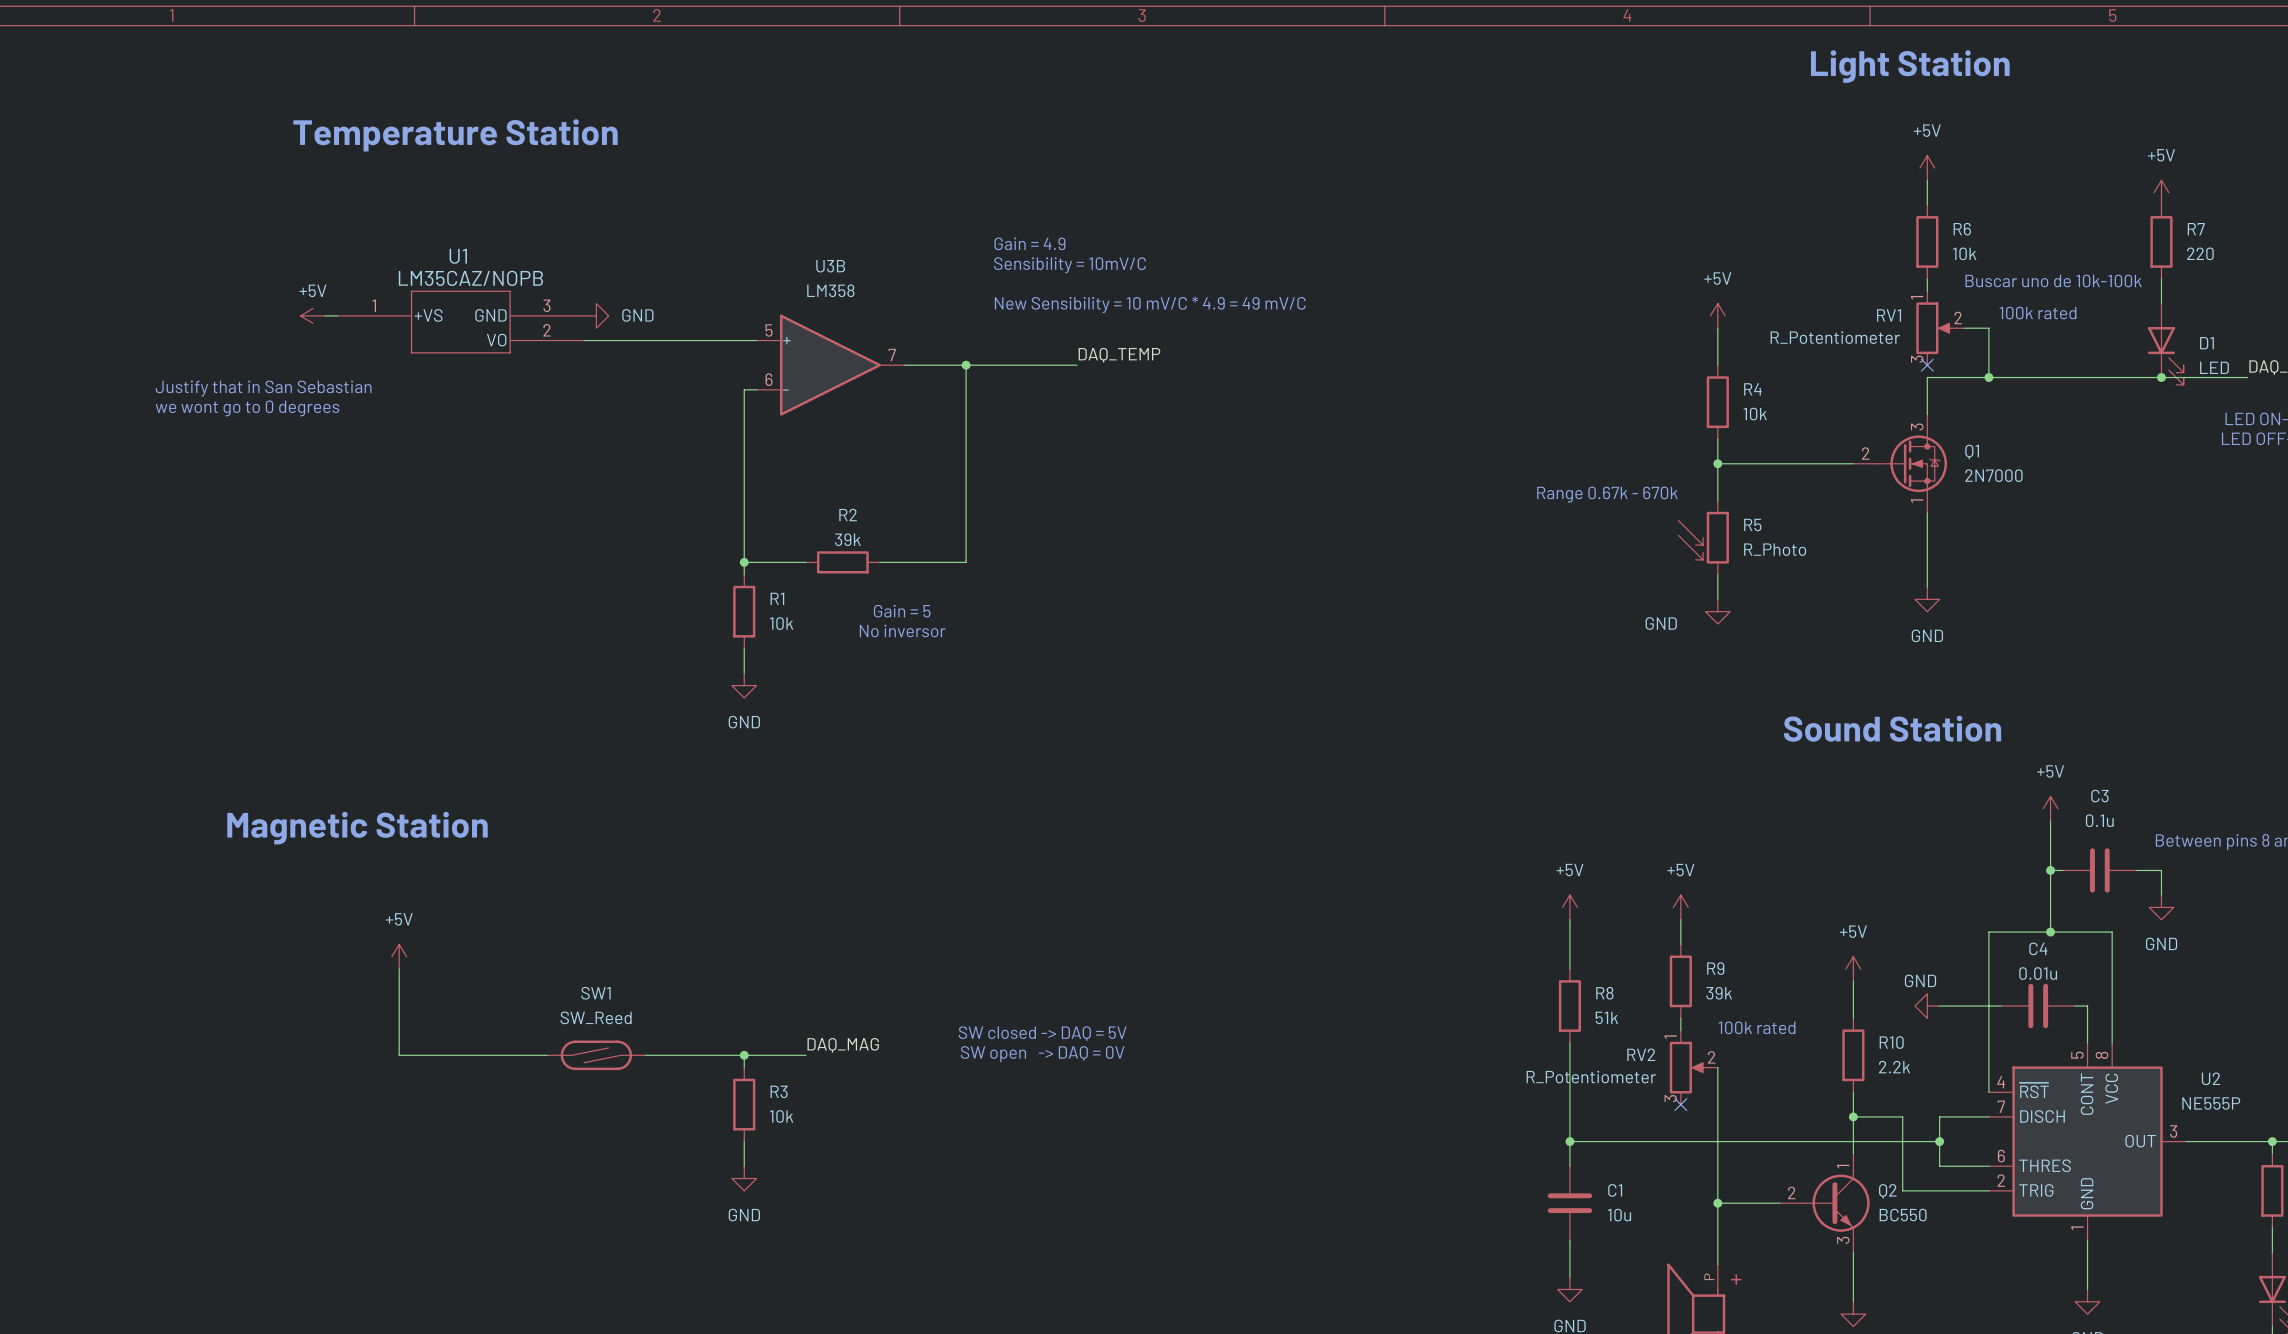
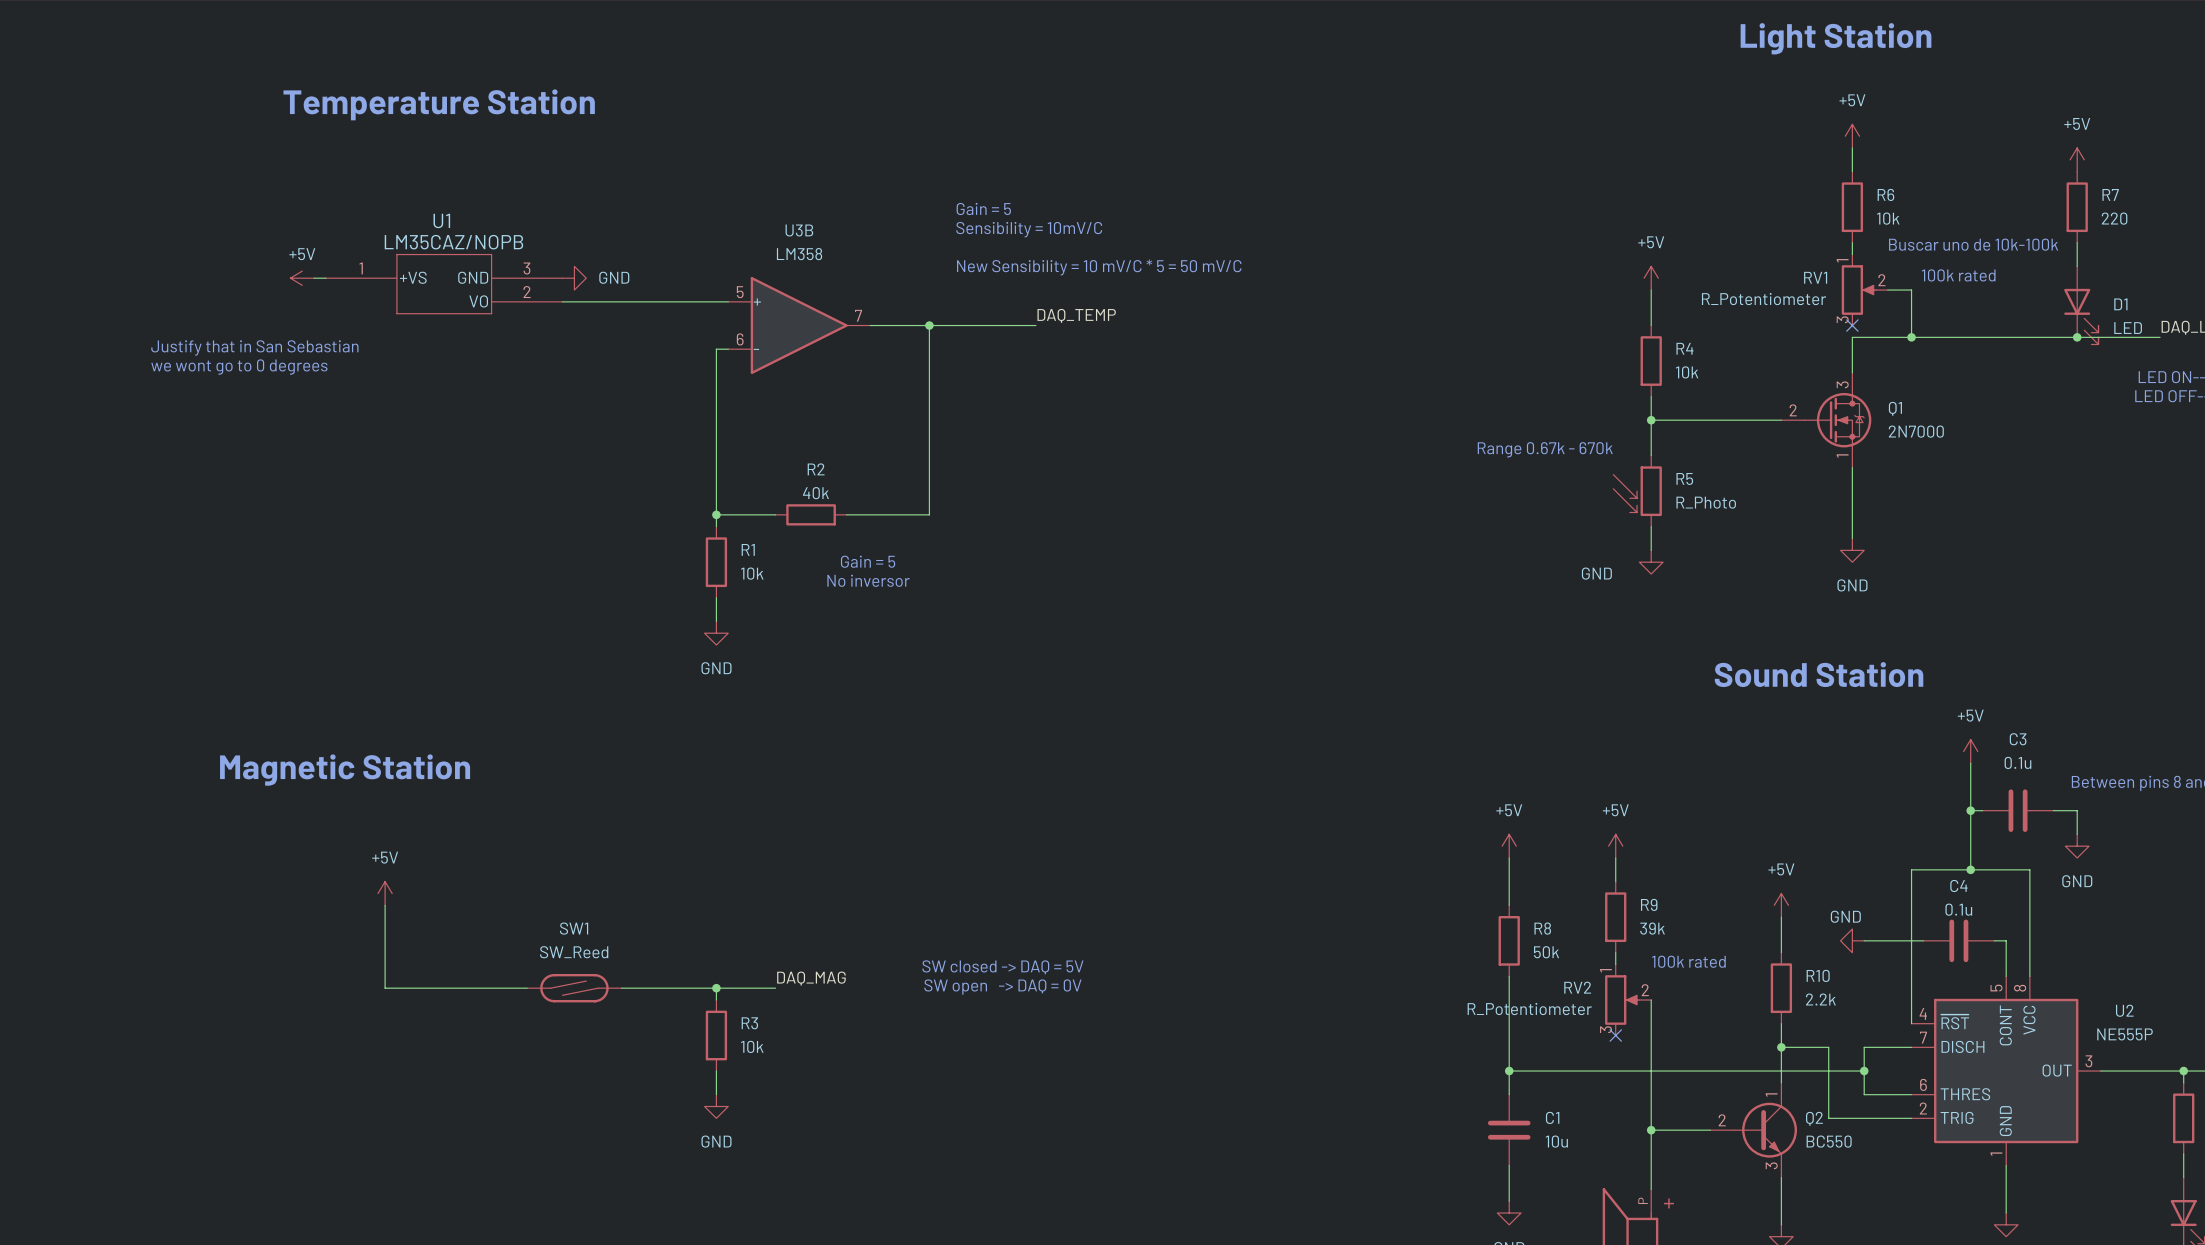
text: Gain = 4.9 (1029, 243) -> Gain = 5 (983, 208)
text: New Sensibility = 10 mV/C * 4.9 = 49 mV/C (1150, 304) -> New Sensibility = 10 mV/C * 5 = 50 mV/C (1099, 267)
R2 value: 39k (847, 539) -> 40k (815, 493)
C4 value: 0.01u (2038, 973) -> 0.1u (1958, 909)
R8 value: 51k (1606, 1017) -> 50k (1546, 952)

